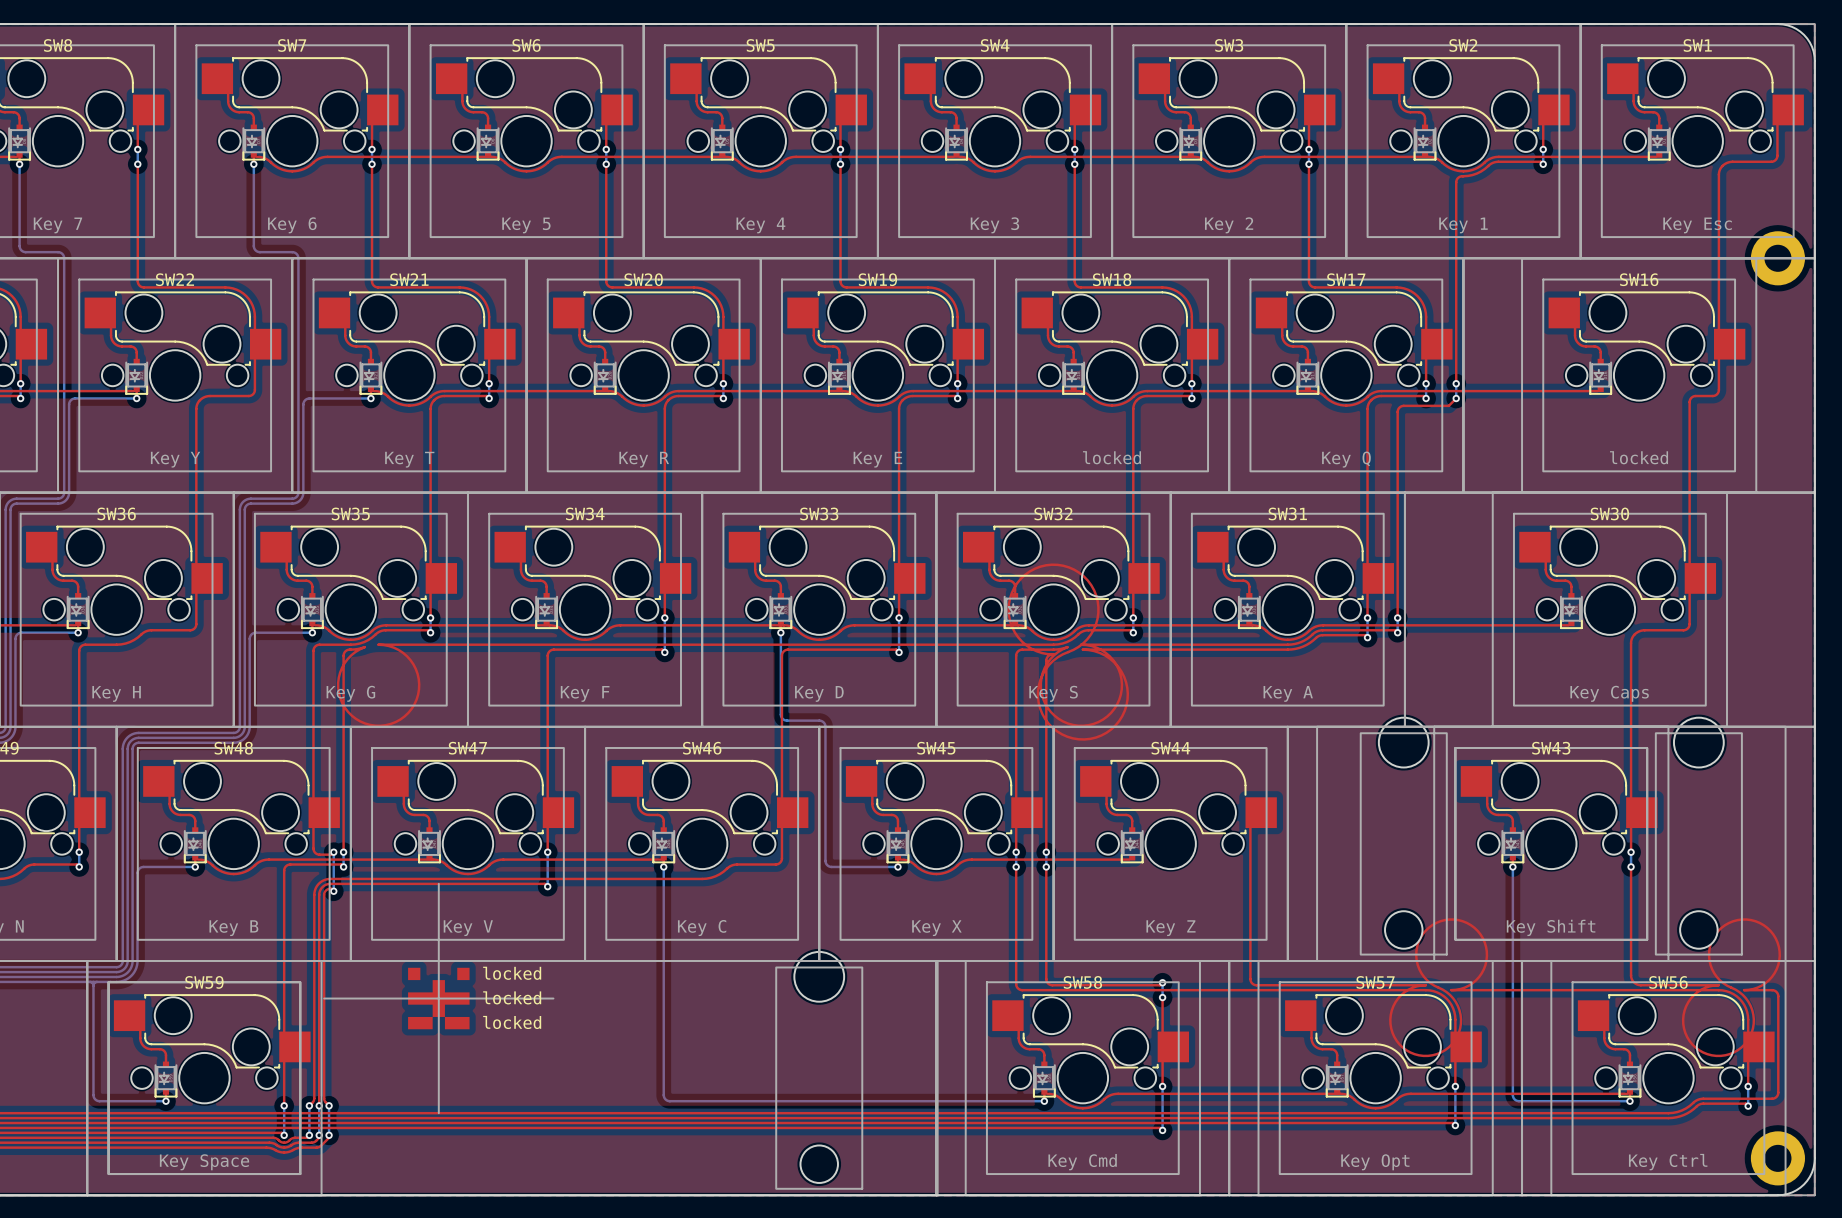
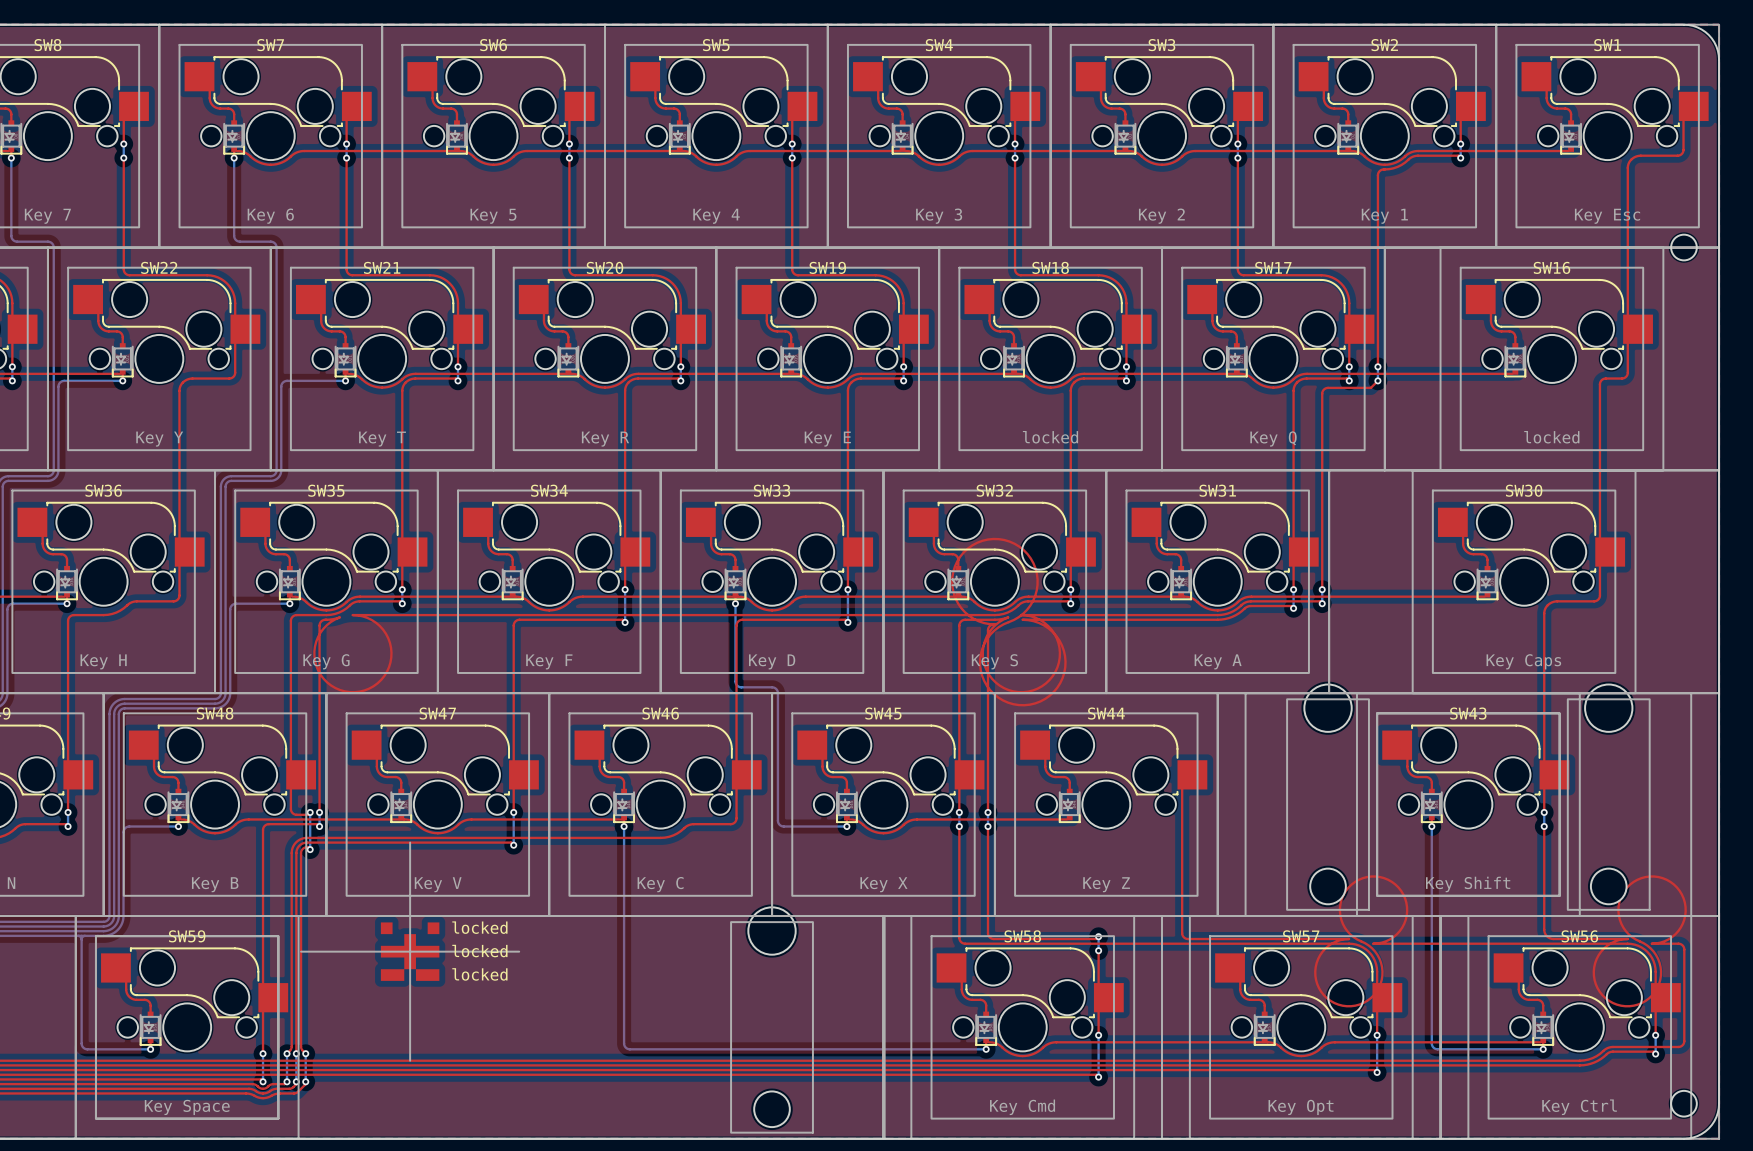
round board edge: none -> [1670, 234, 1698, 261]
part: (1777, 258) -> none
round board edge: none -> [1670, 1090, 1698, 1118]
part: (1777, 1158) -> none

